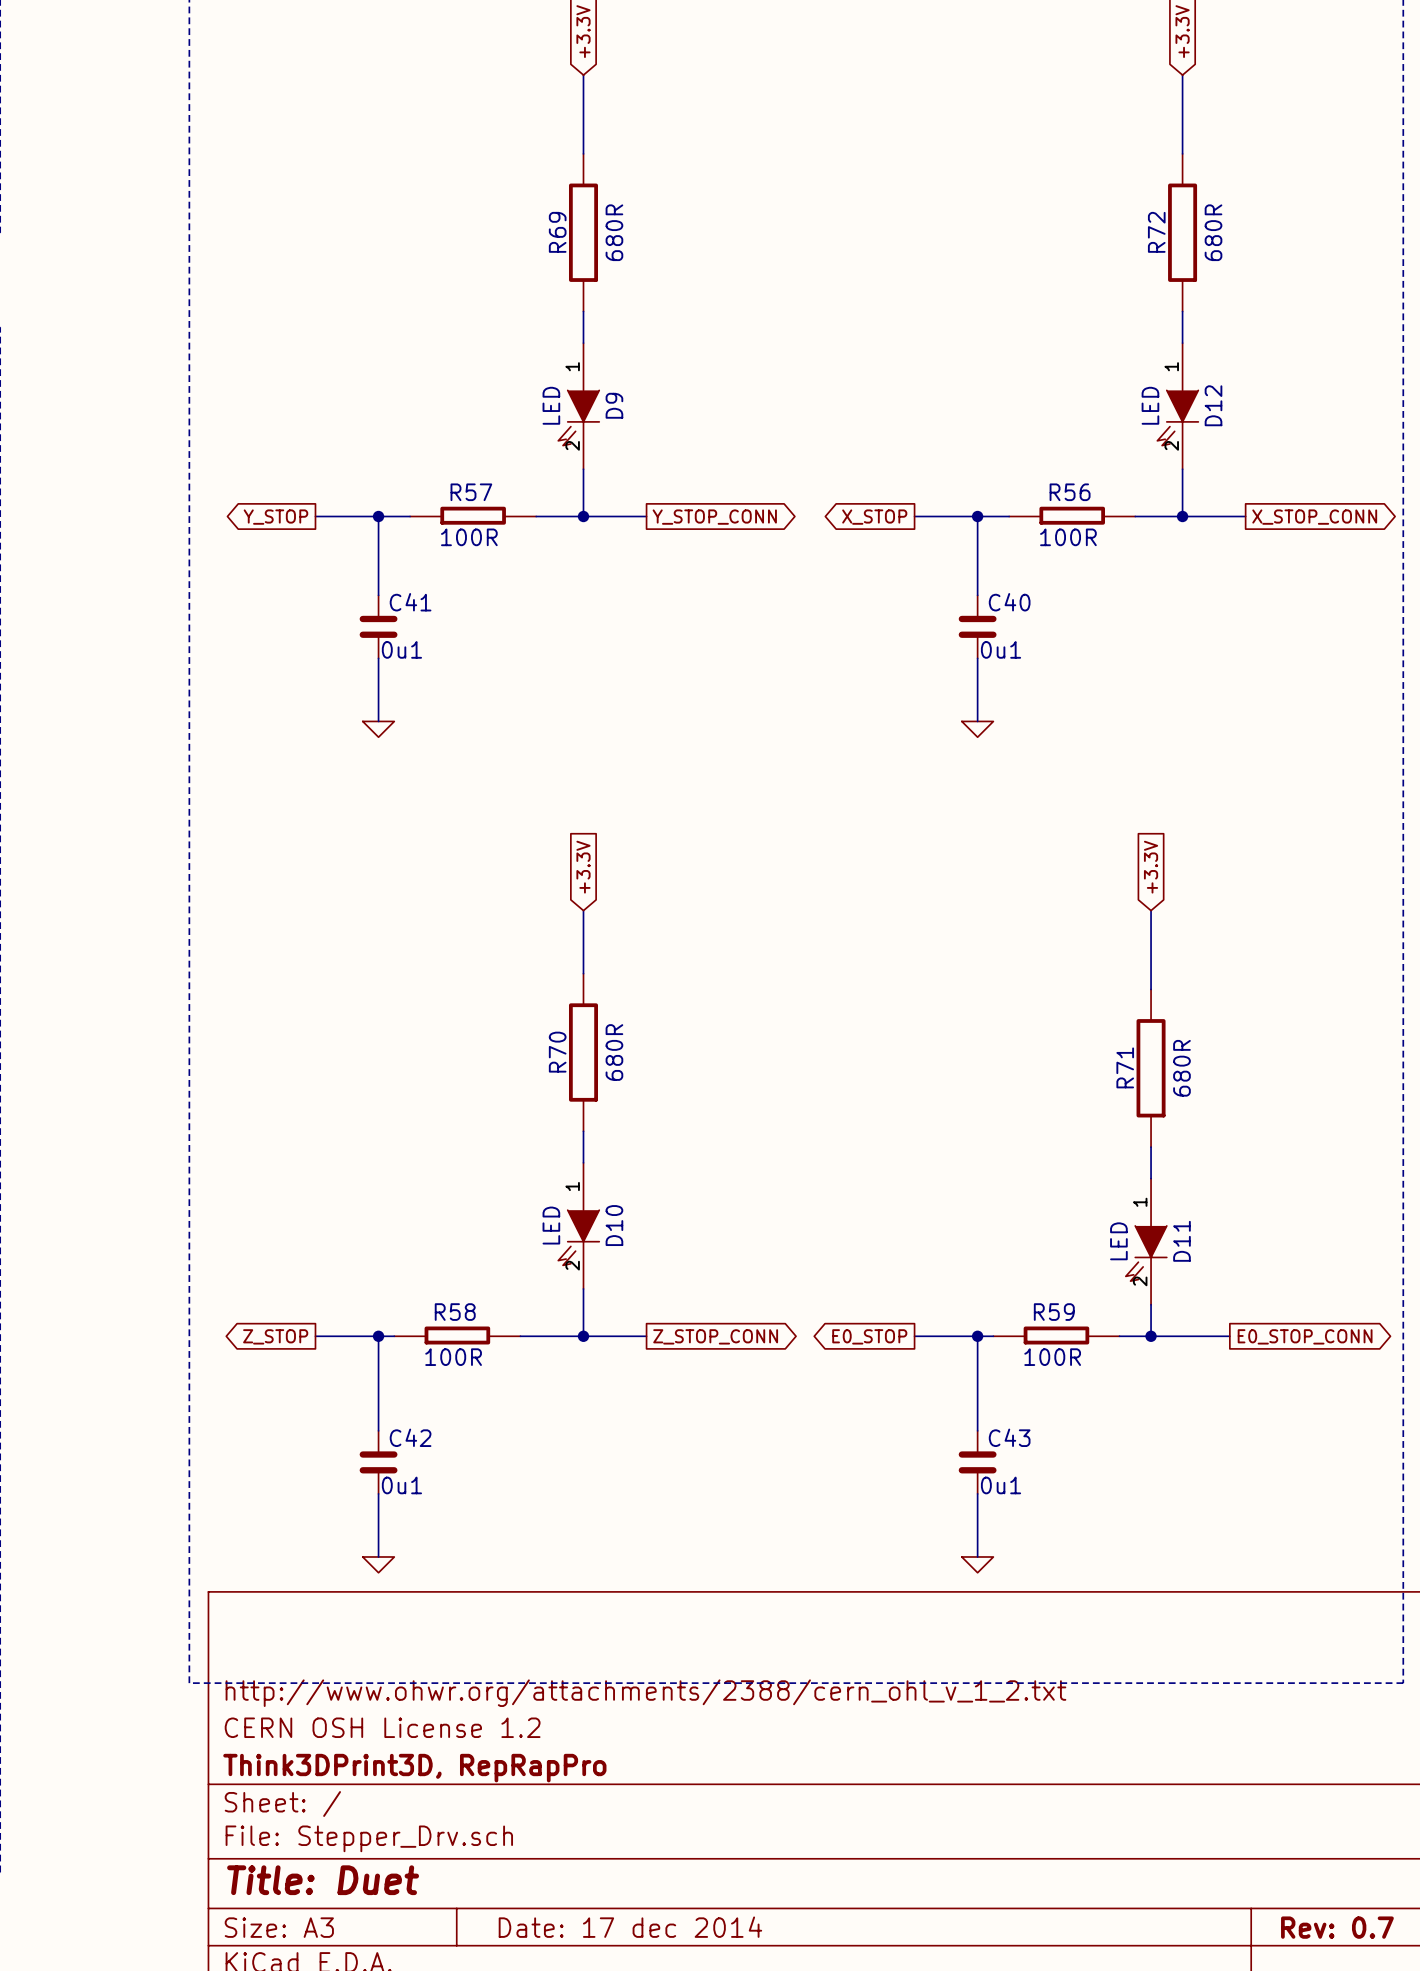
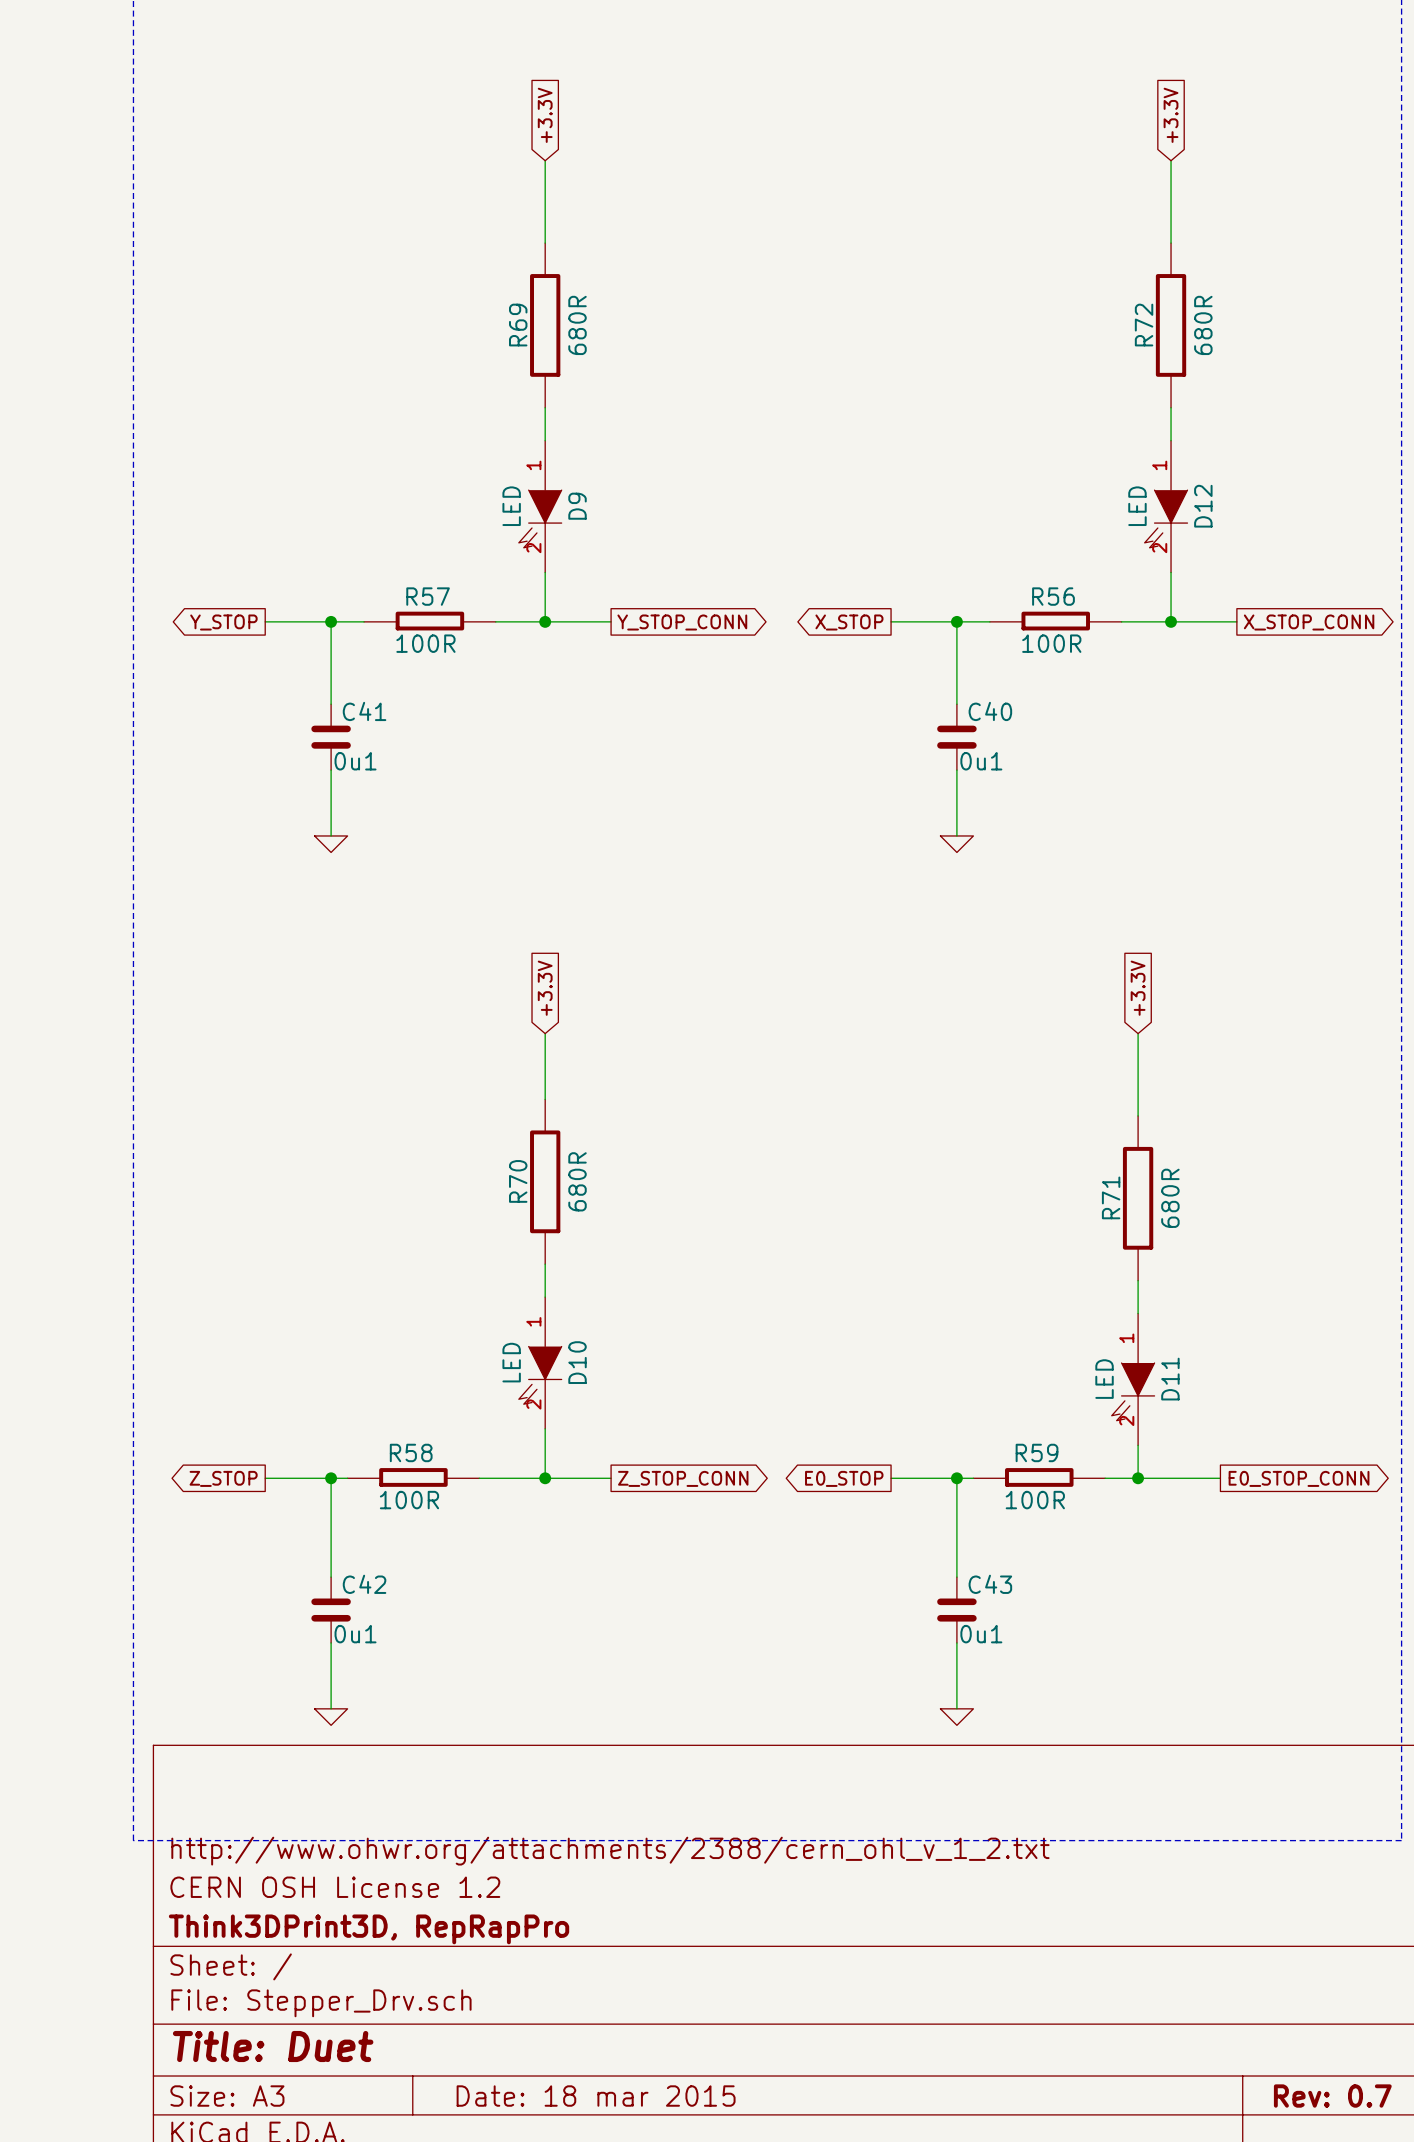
title block: Date: 17 dec 2014 (630, 1927) -> Date: 18 mar 2015 (596, 2096)

